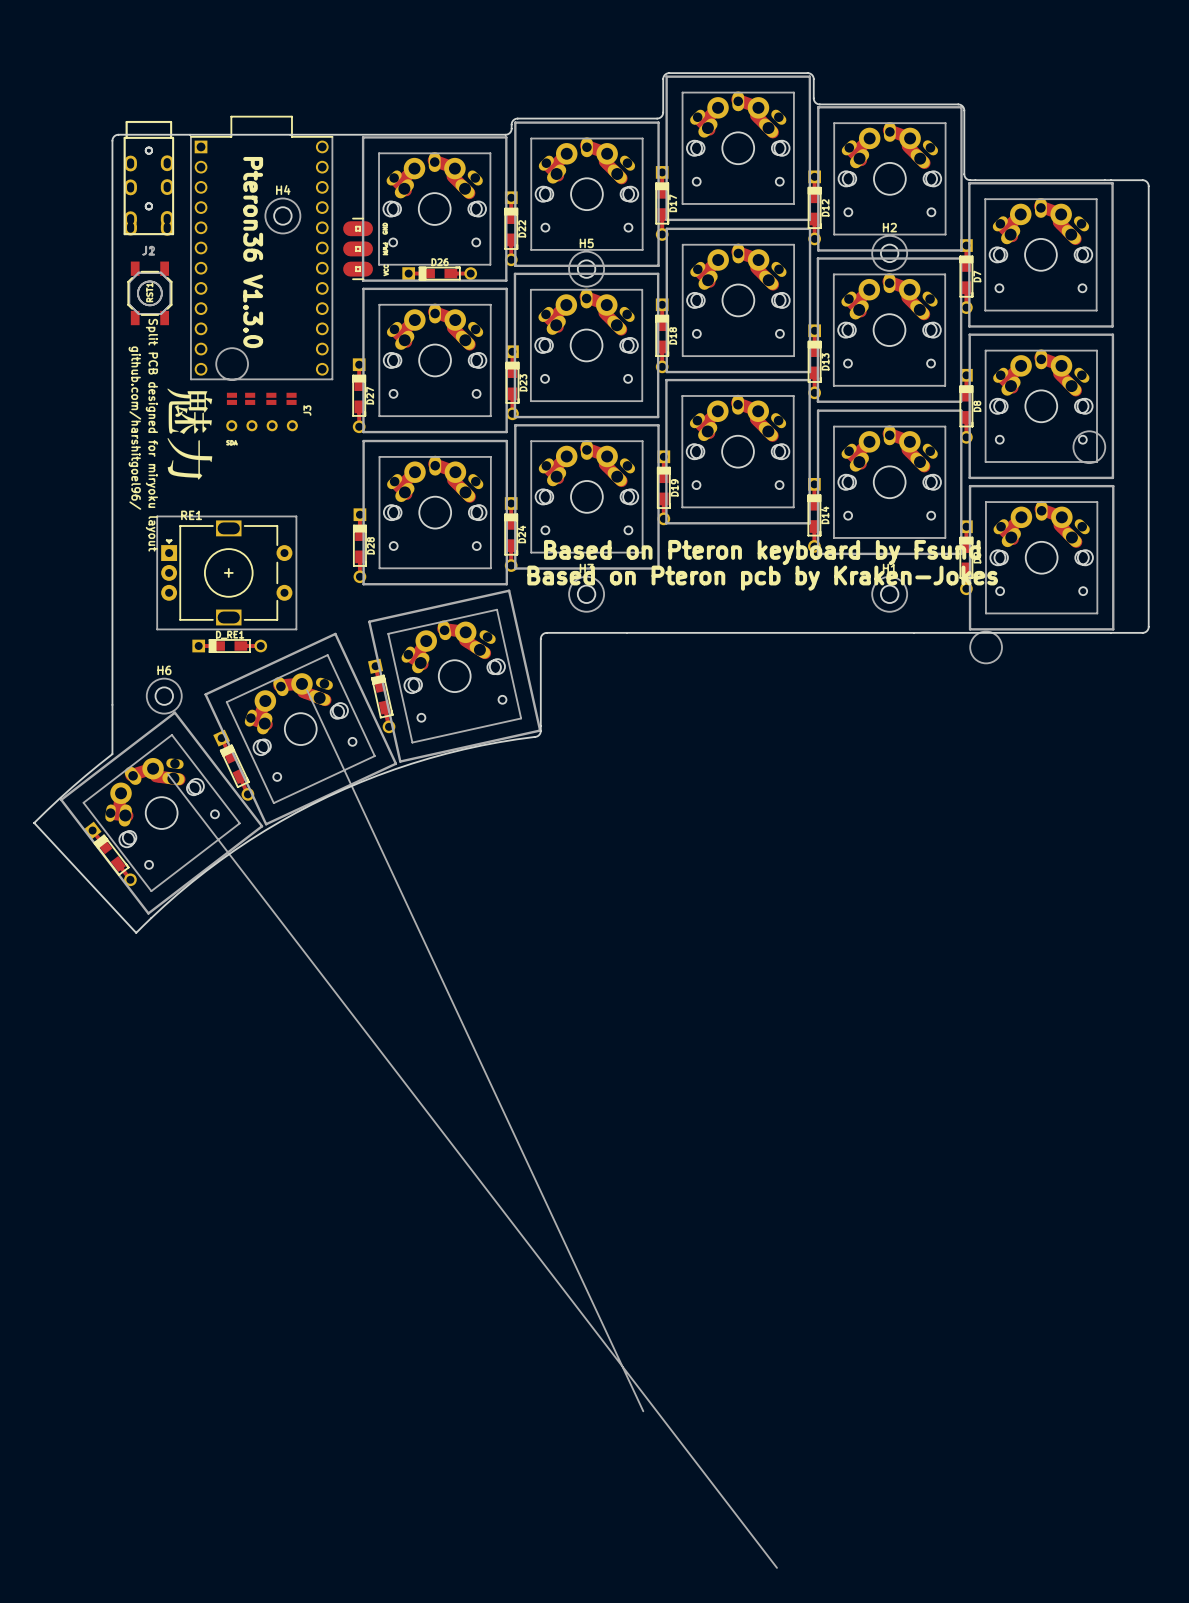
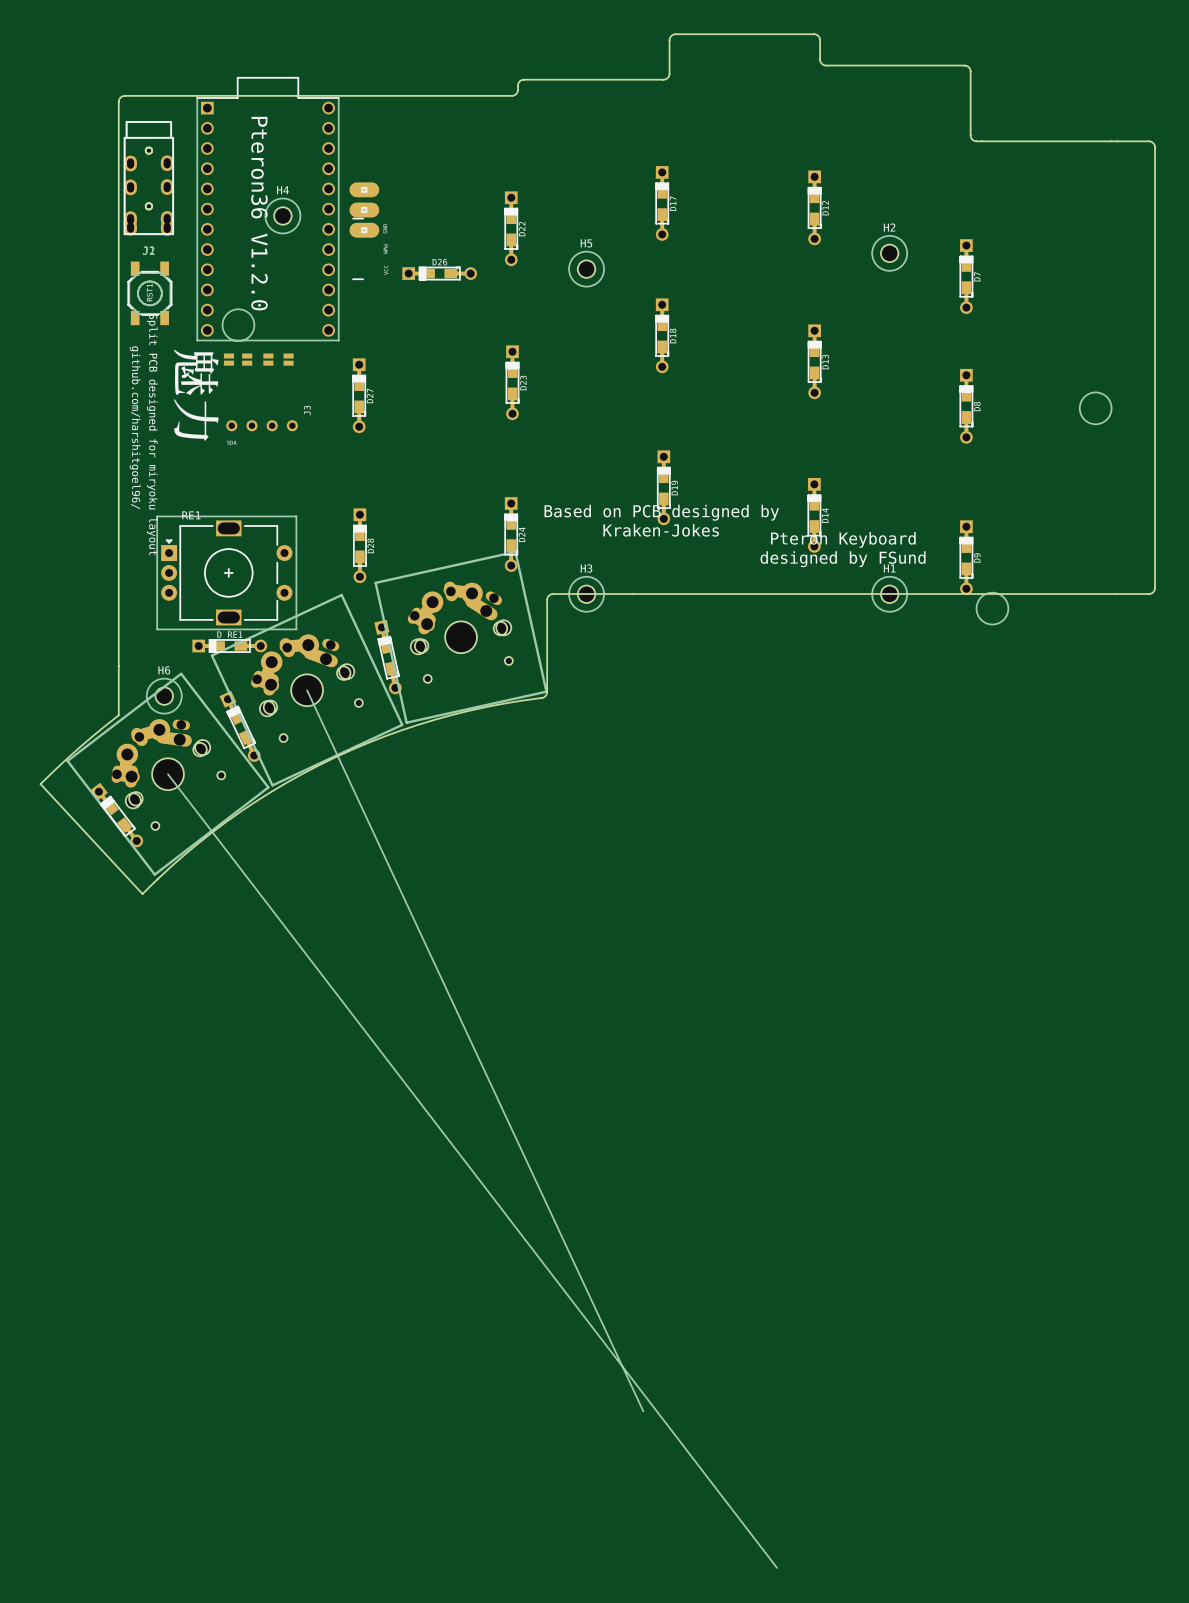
board edge: (669, 73) (808, 73) (813, 77) (813, 99) (818, 104) (960, 104) (964, 110) (964, 174) (968, 179) (1142, 180) (1147, 182) (1147, 629) (1142, 632) (545, 633) (540, 638) (540, 730) (538, 735) (463, 749) (411, 763) (361, 782) (312, 804) (265, 830) (220, 860) (177, 894) (136, 932) (34, 822) (72, 787) (112, 754) (113, 137) (118, 134) (505, 134) (510, 132) (512, 122) (516, 118) (657, 118) (663, 113) (663, 77) (669, 73) -> (675, 34) (814, 34) (819, 38) (820, 60) (824, 65) (966, 66) (970, 71) (970, 136) (975, 141) (1148, 141) (1153, 143) (1154, 590) (1148, 594) (551, 594) (547, 599) (547, 692) (544, 696) (470, 710) (418, 724) (367, 743) (318, 765) (271, 791) (226, 821) (184, 855) (142, 894) (40, 784) (78, 748) (118, 715) (119, 98) (124, 95) (511, 95) (516, 93) (518, 83) (523, 79) (664, 79) (669, 74) (669, 38) (675, 34)
part: (738, 148) -> none
part: (889, 178) -> none
part: (586, 194) -> none
part: (434, 209) -> none
part position: (261, 248) -> (267, 209)
part position: (358, 248) -> (364, 210)
text: Pteron36 V1.3.0 (253, 252) -> Pteron36 V1.2.0 (259, 213)
part: (1040, 254) -> none
part: (738, 300) -> none
part: (889, 330) -> none
part: (586, 345) -> none
part: none -> (228, 359)
part: none -> (247, 359)
part: none -> (268, 359)
part: none -> (288, 359)
part: (435, 360) -> none
drawing position: (232, 364) -> (238, 325)
part: (231, 398) -> none
part: (250, 398) -> none
part: (271, 398) -> none
part: (291, 398) -> none
part: (1041, 406) -> none
drawing position: (189, 434) -> (196, 395)
drawing position: (1089, 447) -> (1095, 408)
part: (738, 451) -> none
part: (889, 482) -> none
part: (586, 496) -> none
part: (435, 512) -> none
text: none -> Based on PCB designed by (661, 512)
text: none -> Kraken-Jokes (661, 530)
text: none -> Pteron Keyboard (843, 539)
text: Based on Pteron keyboard by Fsund (762, 552) -> none
part: (1041, 557) -> none
text: none -> designed by FSund (843, 559)
text: Based on Pteron pcb by Kraken-Jokes (762, 578) -> none
part: none -> (461, 637)
drawing position: (986, 647) -> (992, 608)
part: (454, 676) -> none
part: none -> (307, 690)
part position: (381, 695) -> (388, 657)
part: (300, 729) -> none
part position: (233, 765) -> (240, 726)
part: none -> (167, 774)
part: (161, 813) -> none
part position: (110, 853) -> (116, 815)

